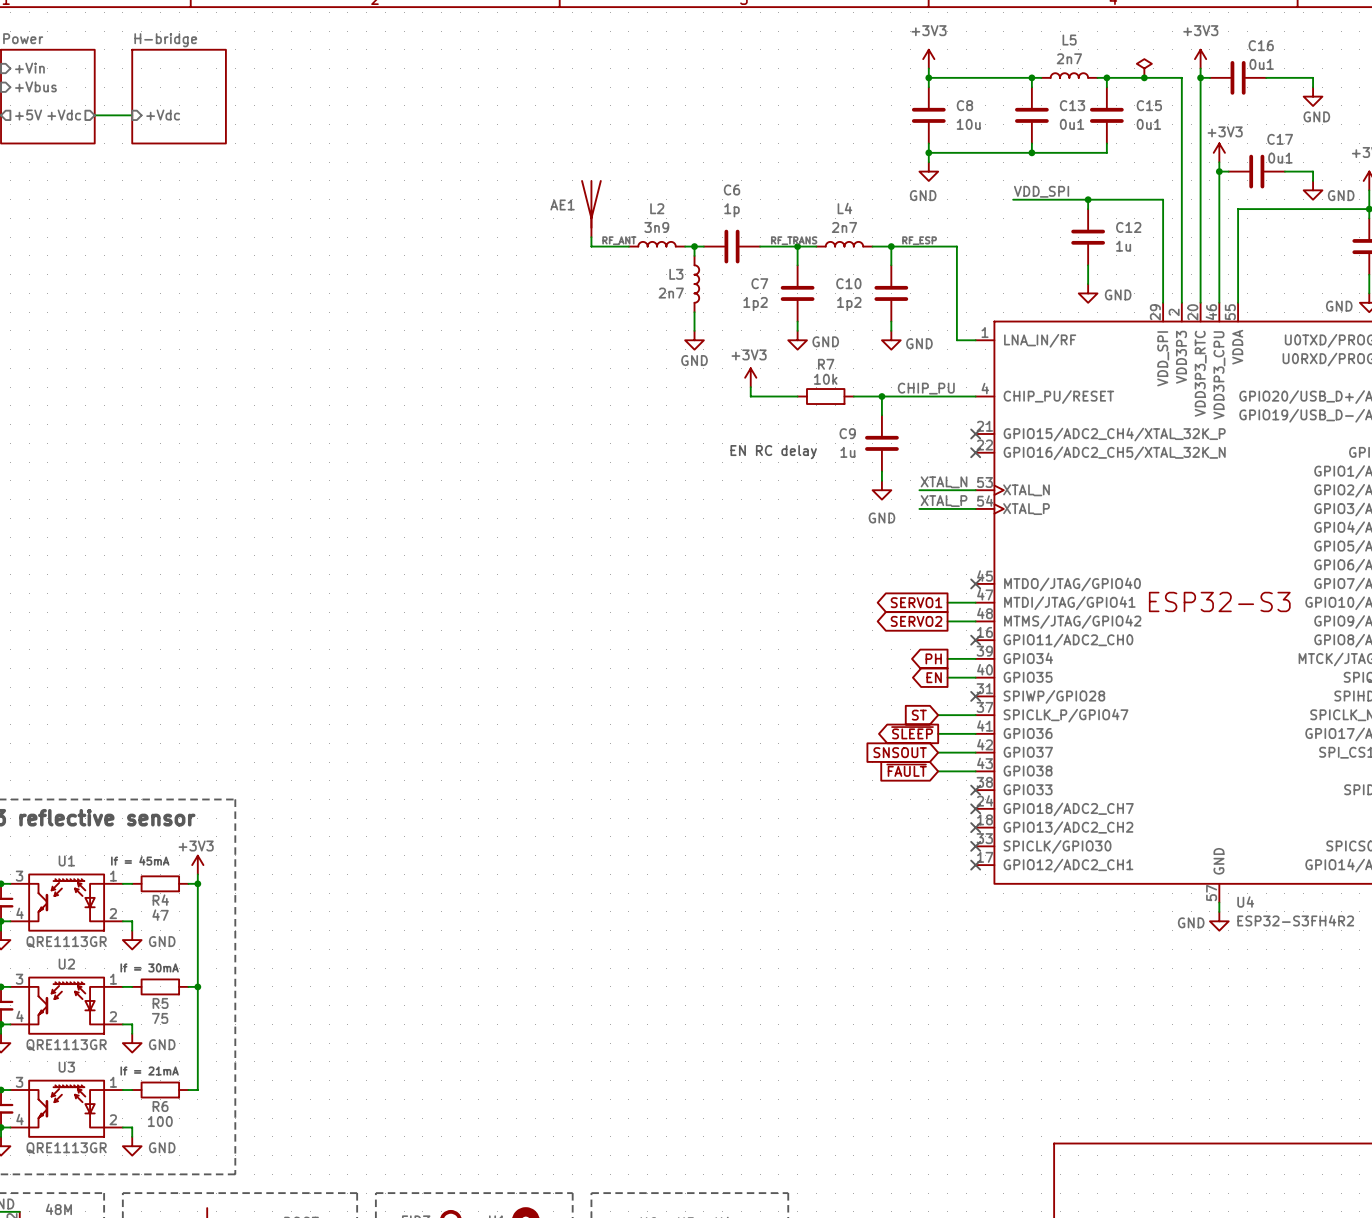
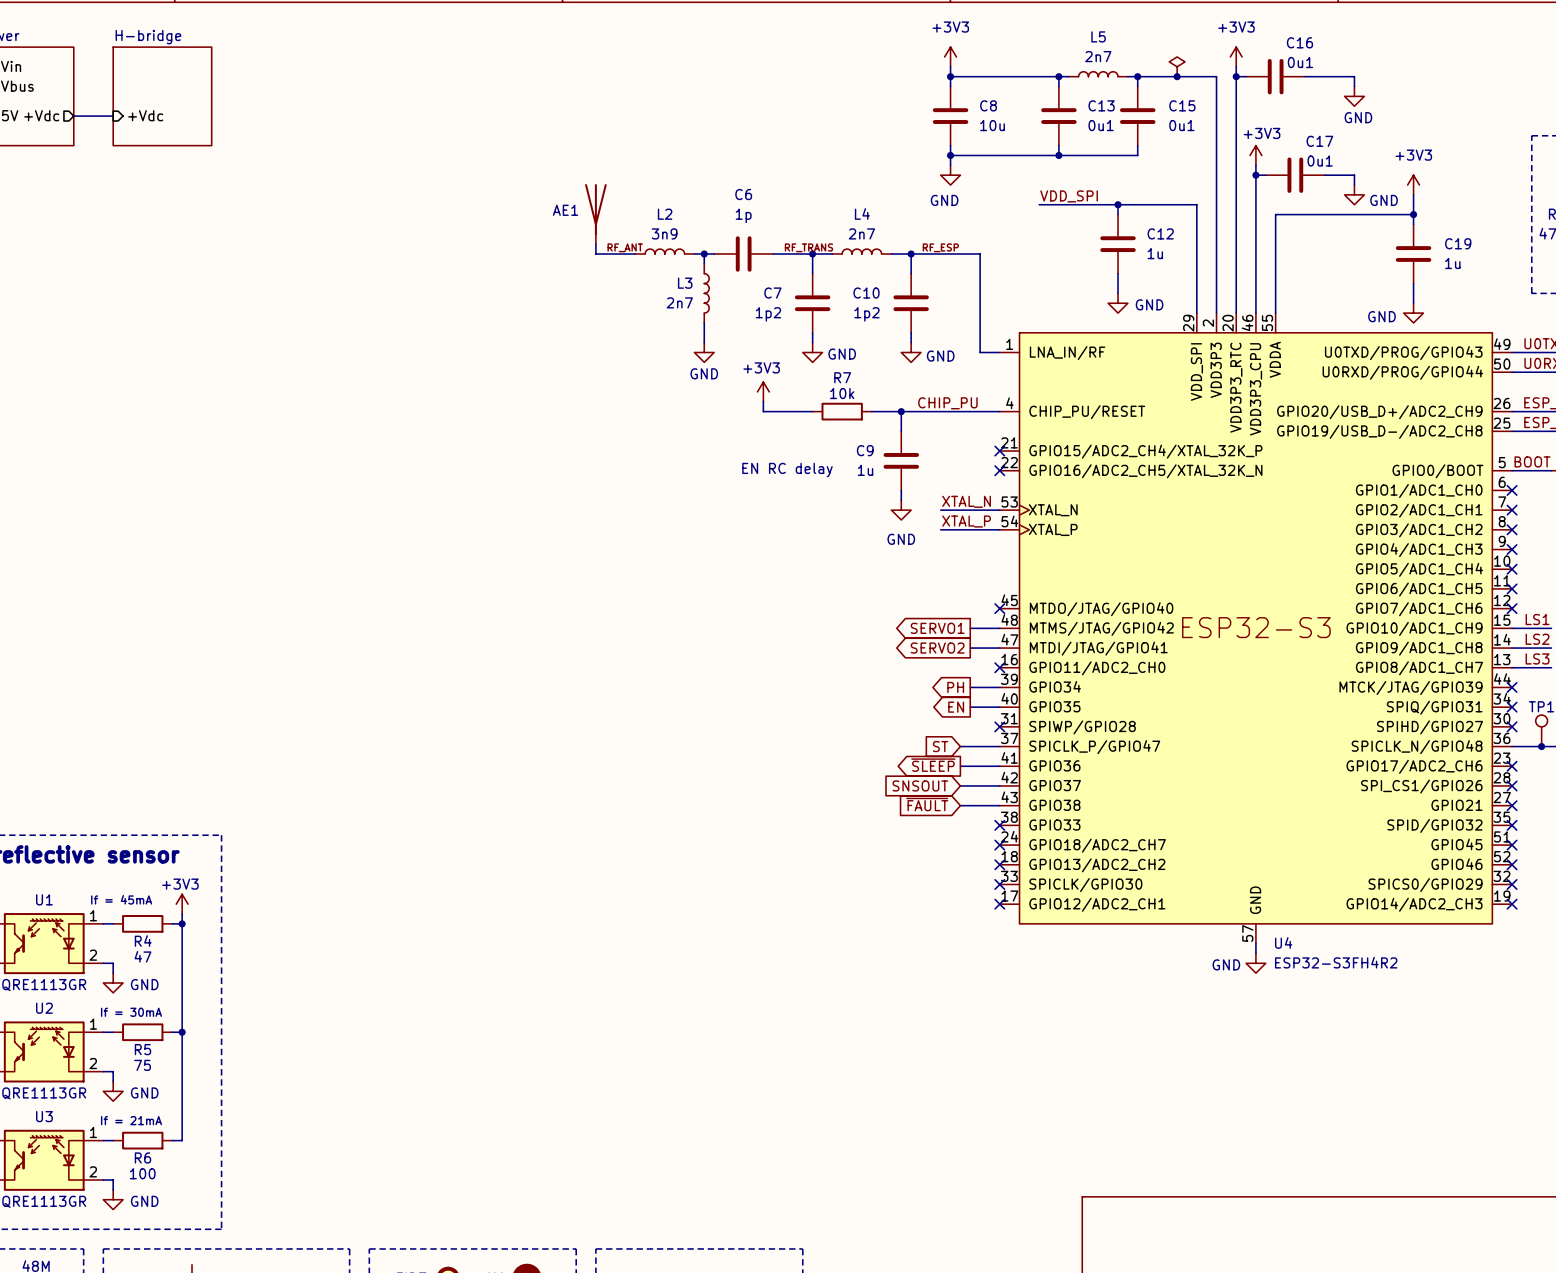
U4 pin number: 47 (985, 594) -> 48 (1009, 619)
U4 pin name: MTDI/JTAG/GPIO41 (1069, 603) -> MTMS/JTAG/GPIO42 (1101, 628)
U4 pin number: 48 (985, 613) -> 47 (1009, 639)
U4 pin name: MTMS/JTAG/GPIO42 (1072, 621) -> MTDI/JTAG/GPIO41 (1098, 648)

